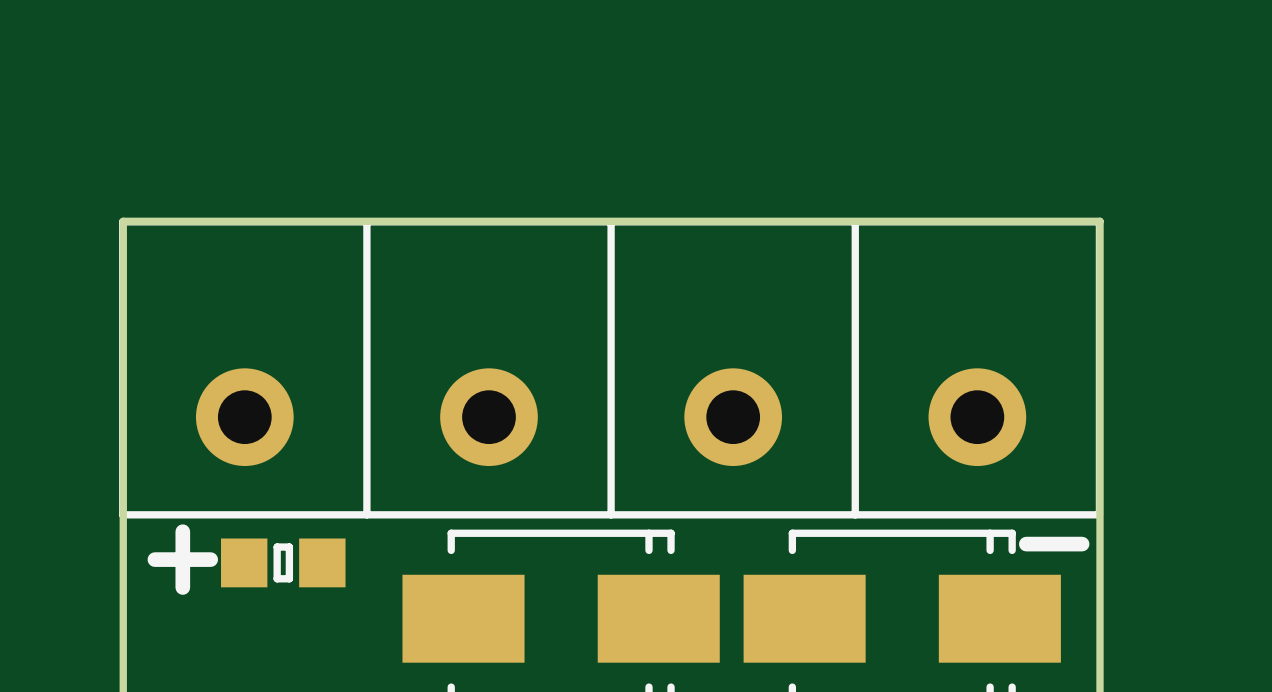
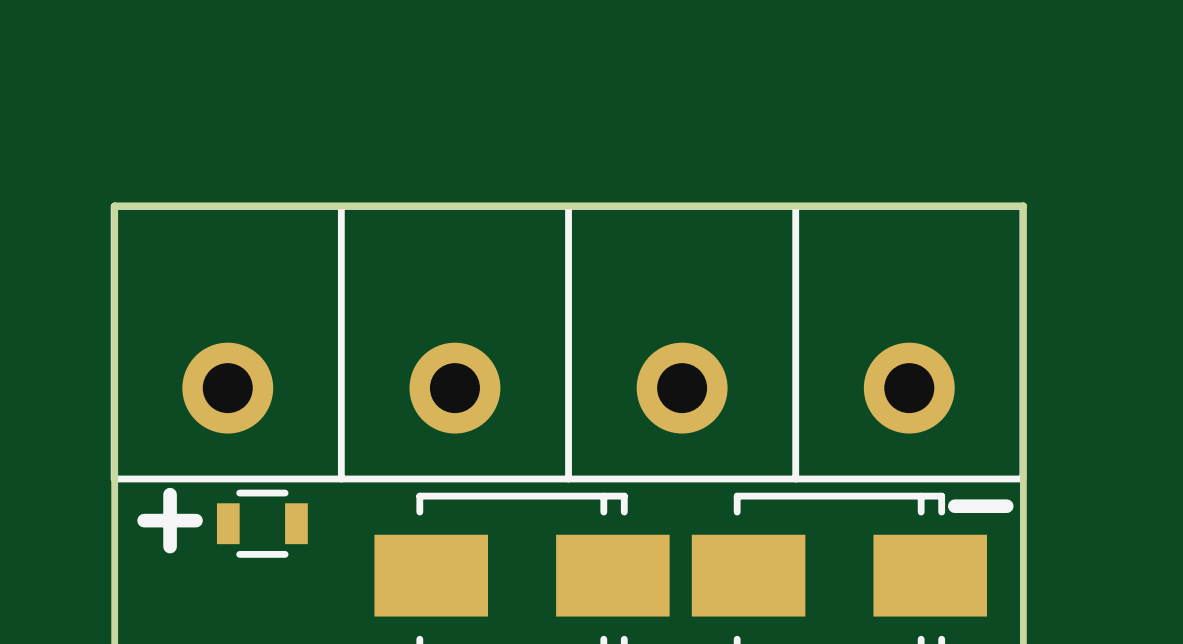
part footprint: [221, 538, 346, 588] -> [216, 489, 308, 558]

